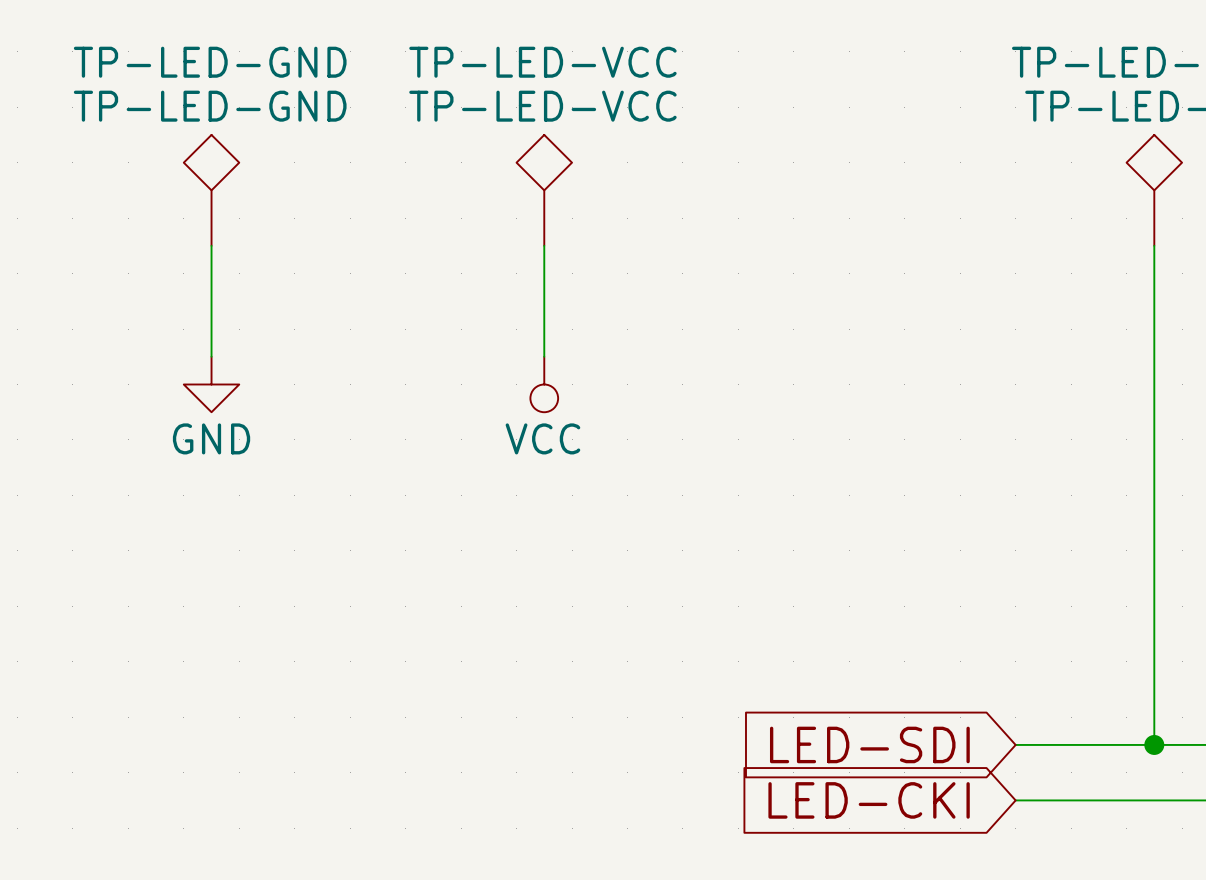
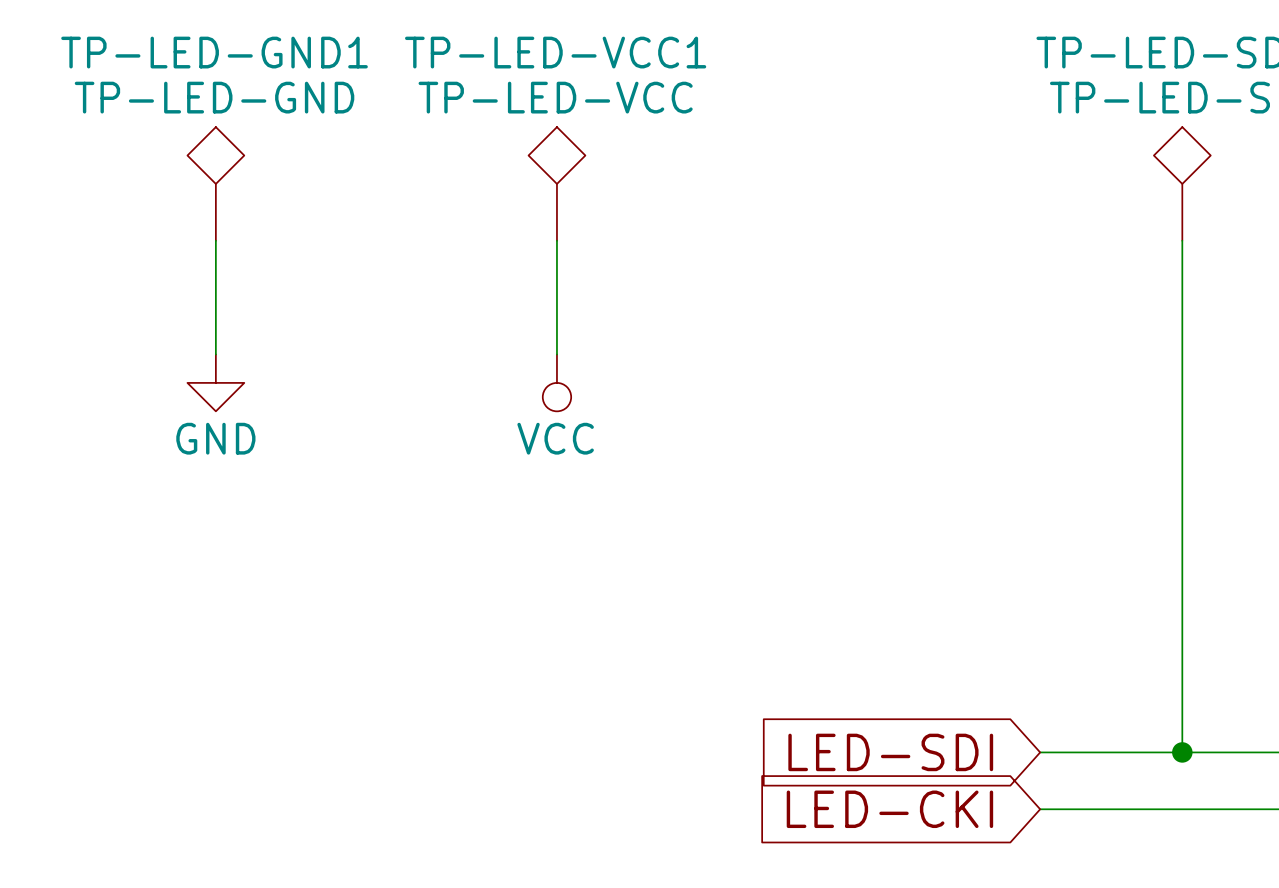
TP-LED-GND name: TP-LED-GND (210, 62) -> TP-LED-GND1 (214, 52)
TP-LED-VCC name: TP-LED-VCC (542, 62) -> TP-LED-VCC1 (555, 52)

